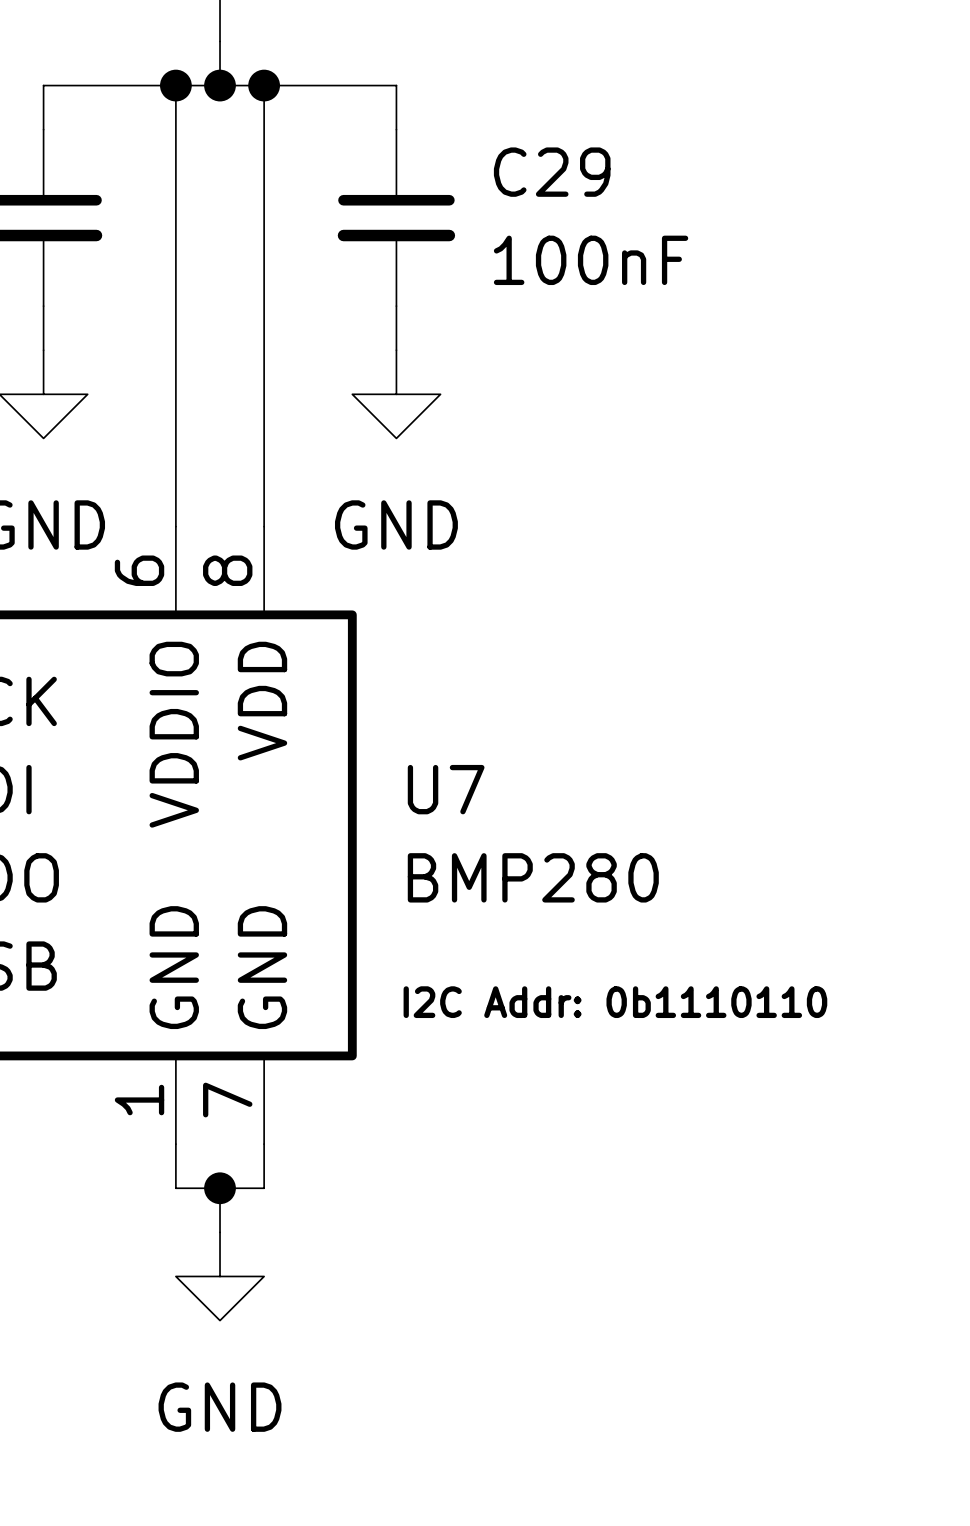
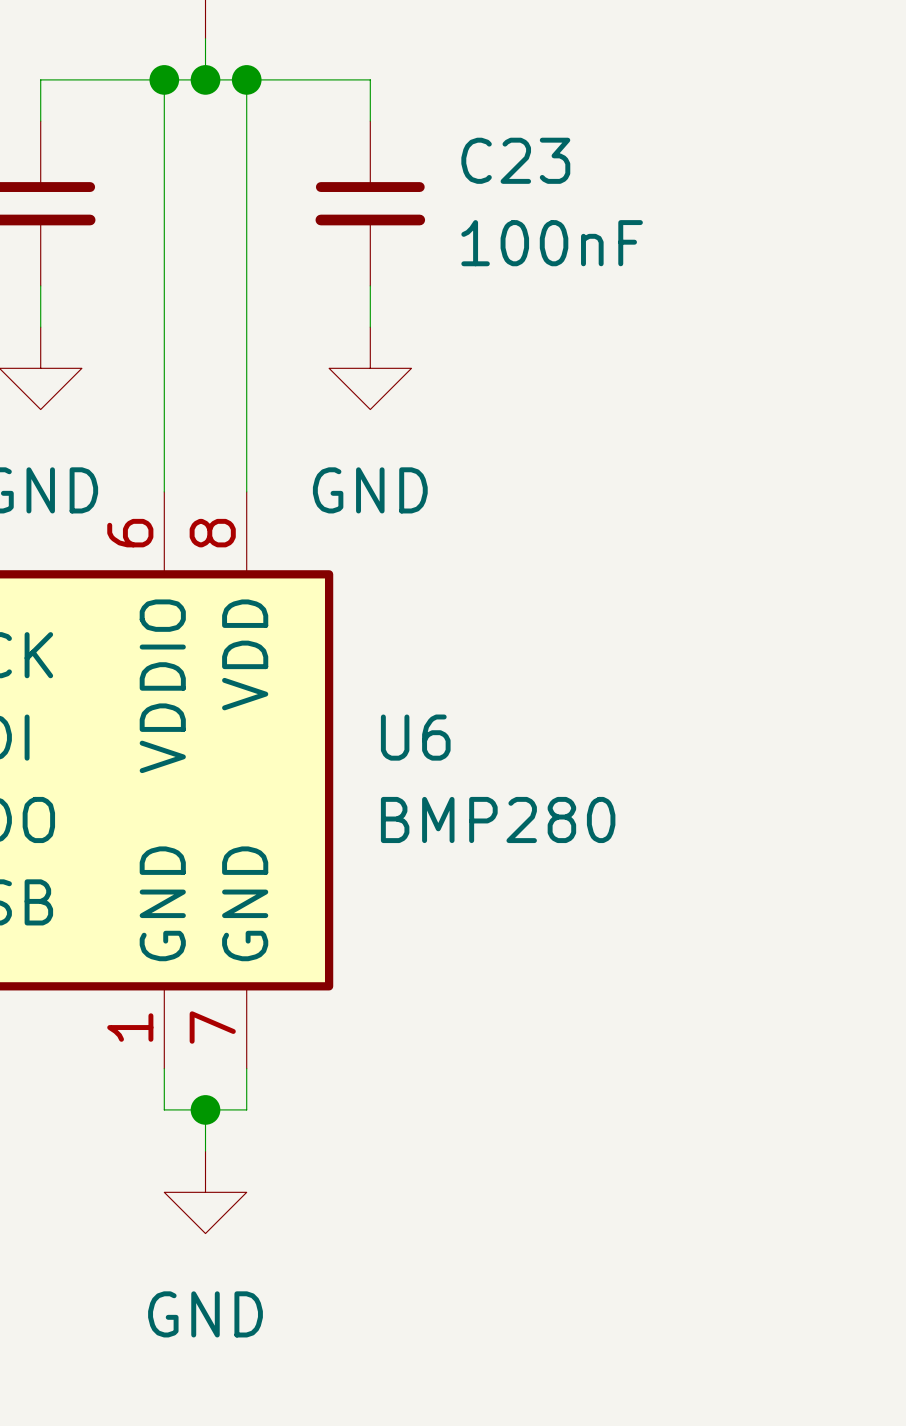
C29 name: C29 (552, 172) -> C23 (515, 160)
U7 name: U7 (446, 789) -> U6 (415, 737)
text: I2C Addr: 0b1110110 (615, 1002) -> none

